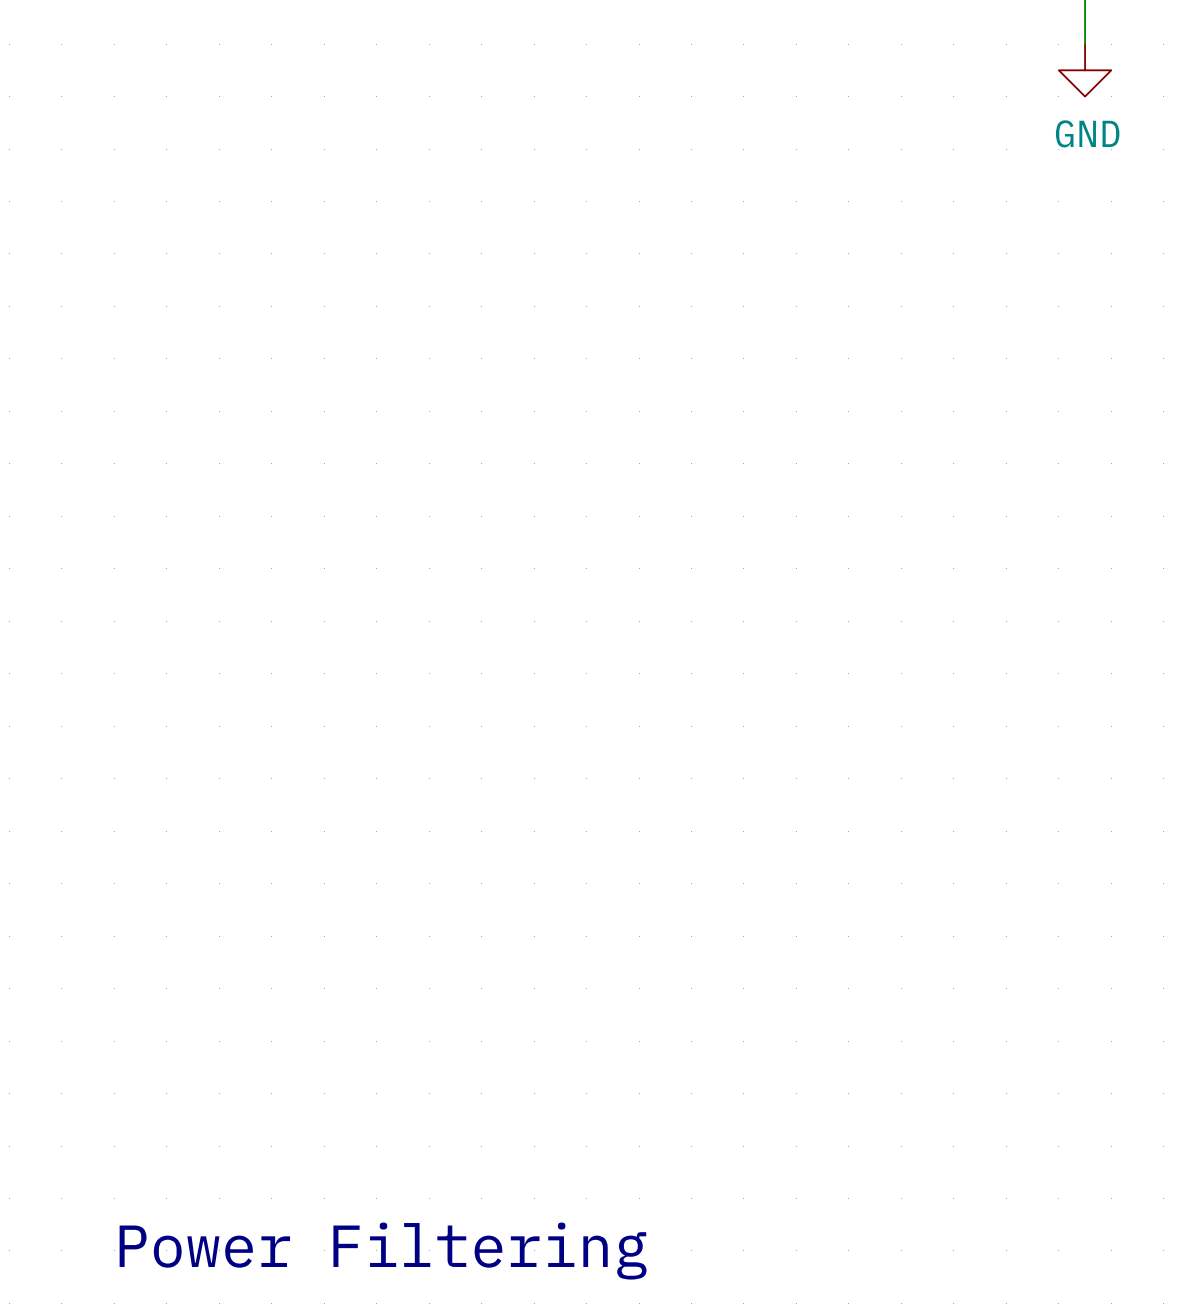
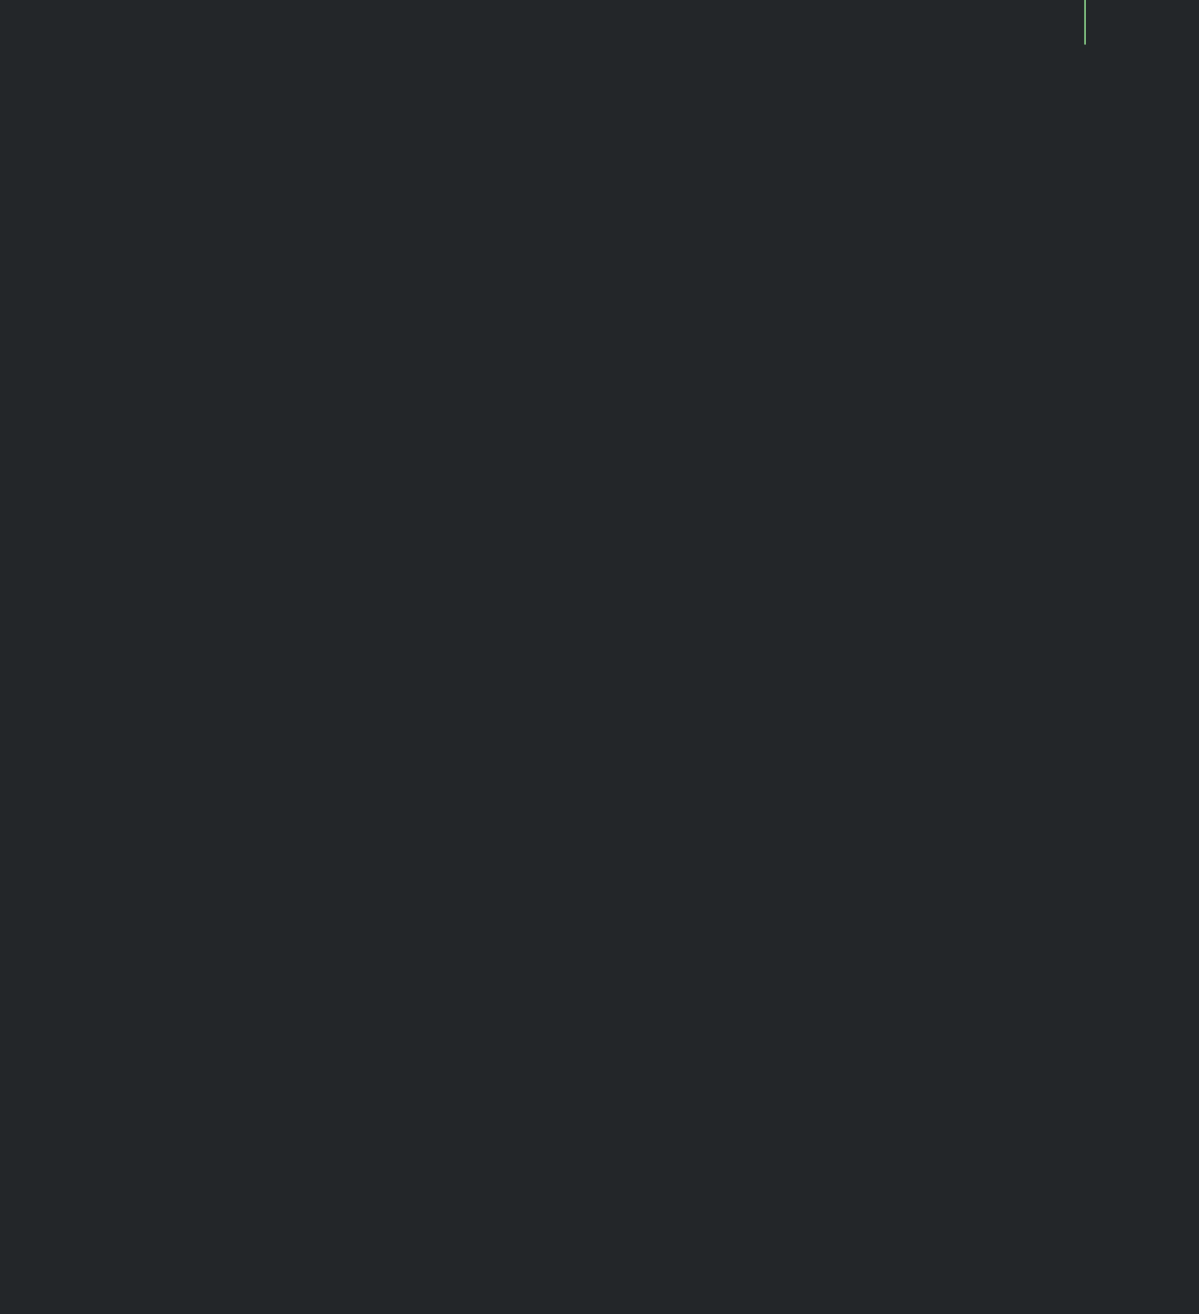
power symbol: GND (1085, 70) -> none
text: Power Filtering (383, 1251) -> none

